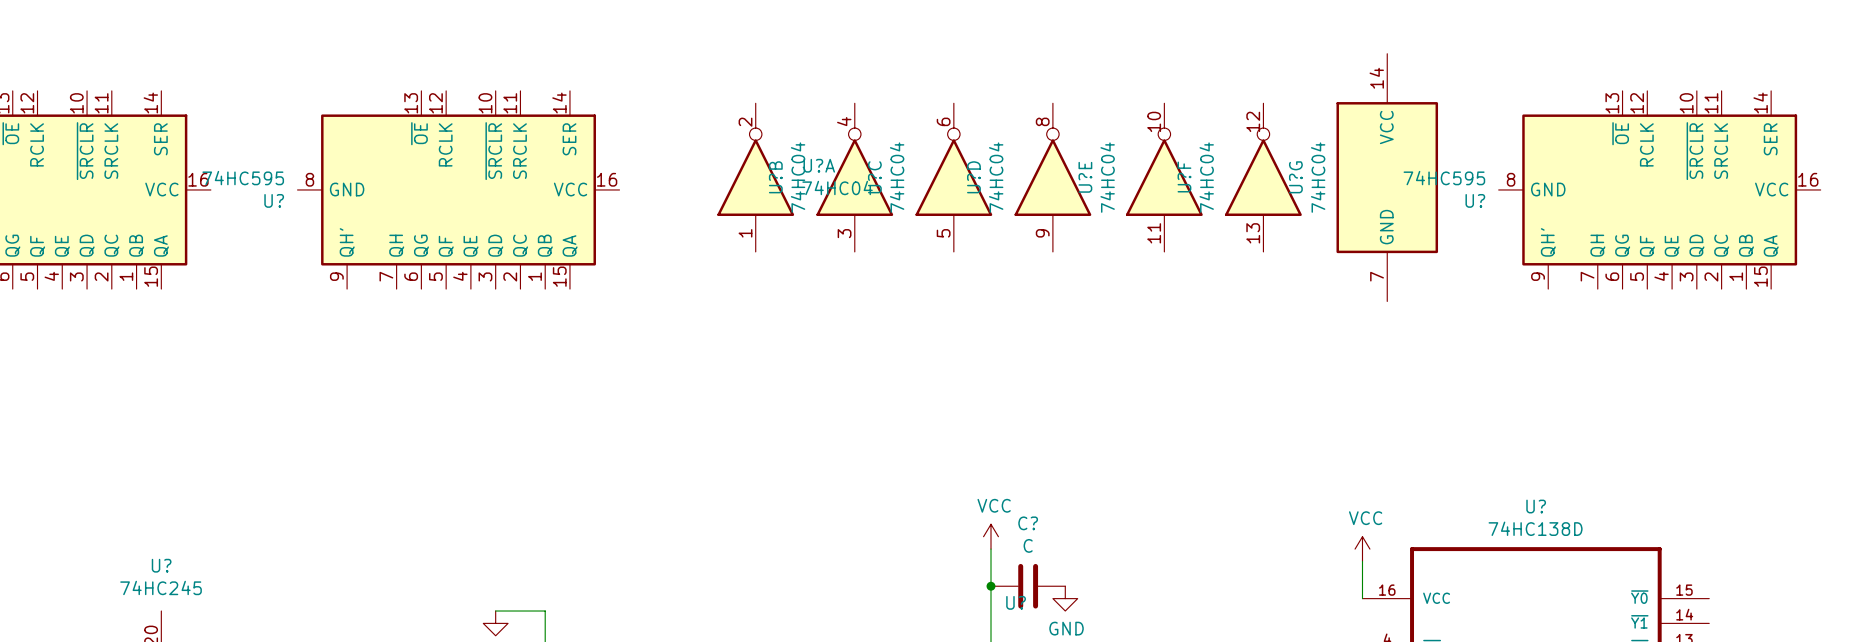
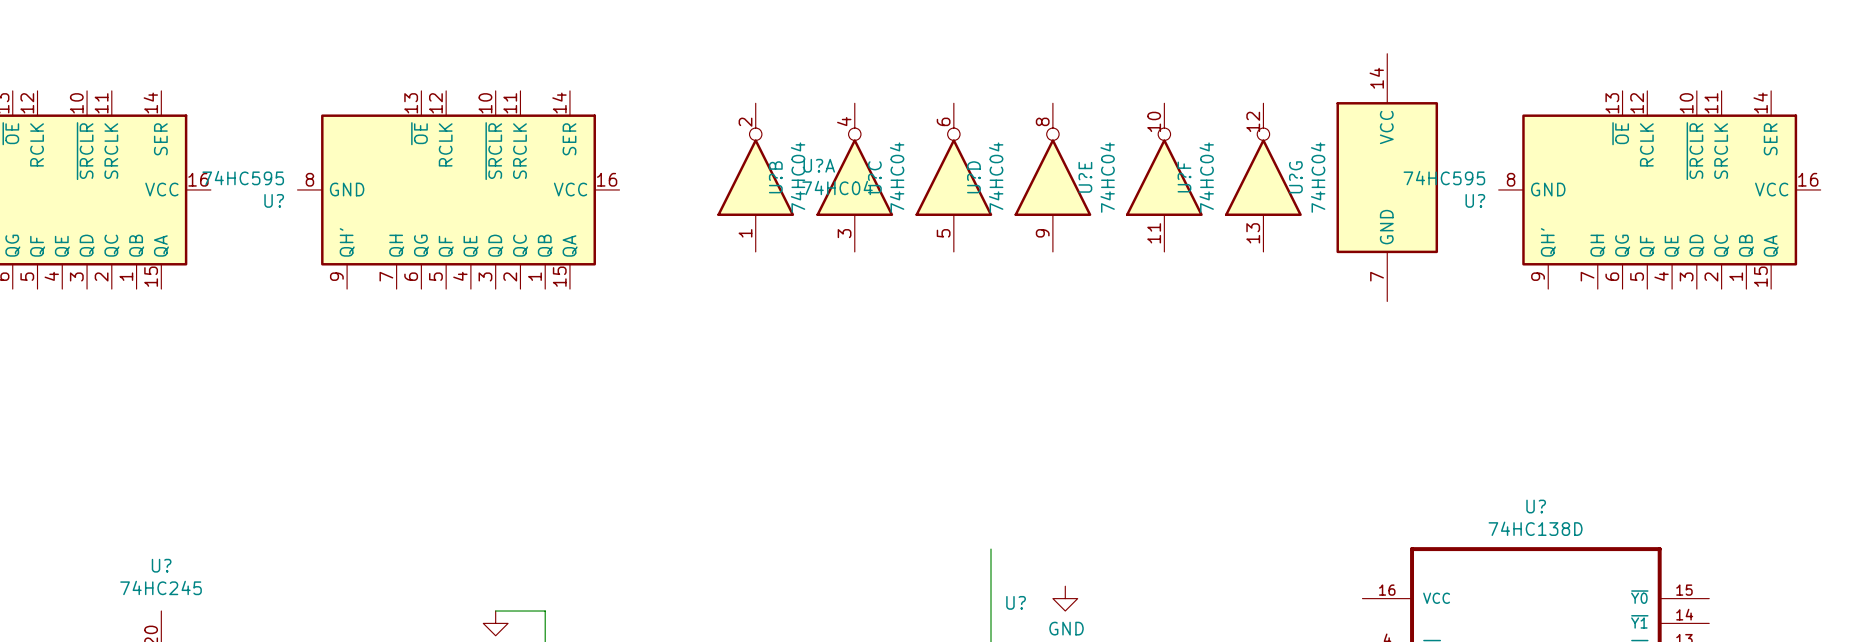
power symbol: VCC (991, 536) -> none
power symbol: VCC (1362, 549) -> none
wire: (1362, 561) (1362, 598) -> none
junction: (991, 586) -> none
C?: C (1028, 586) -> none

